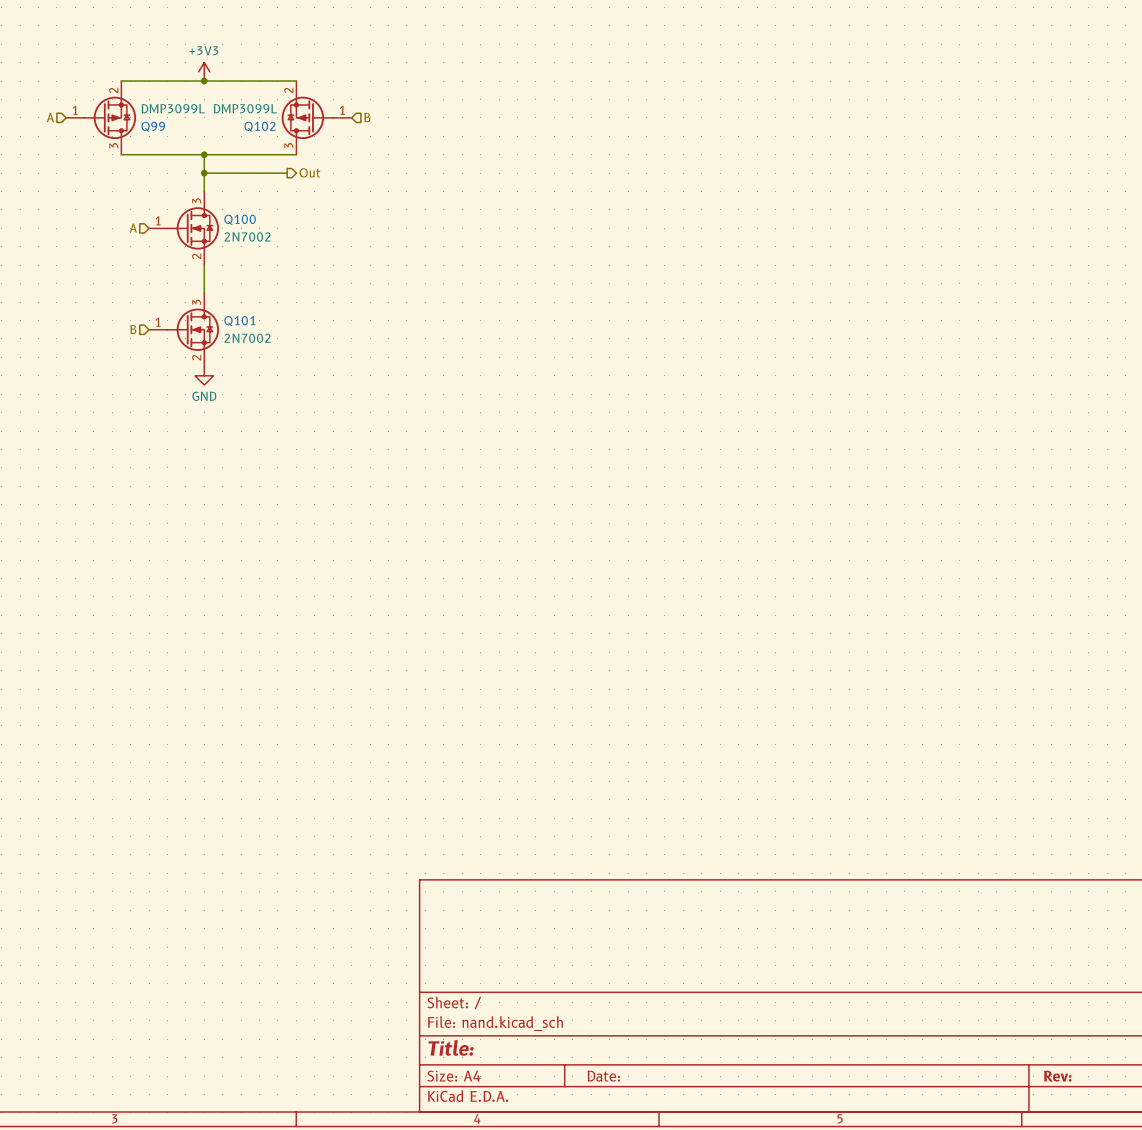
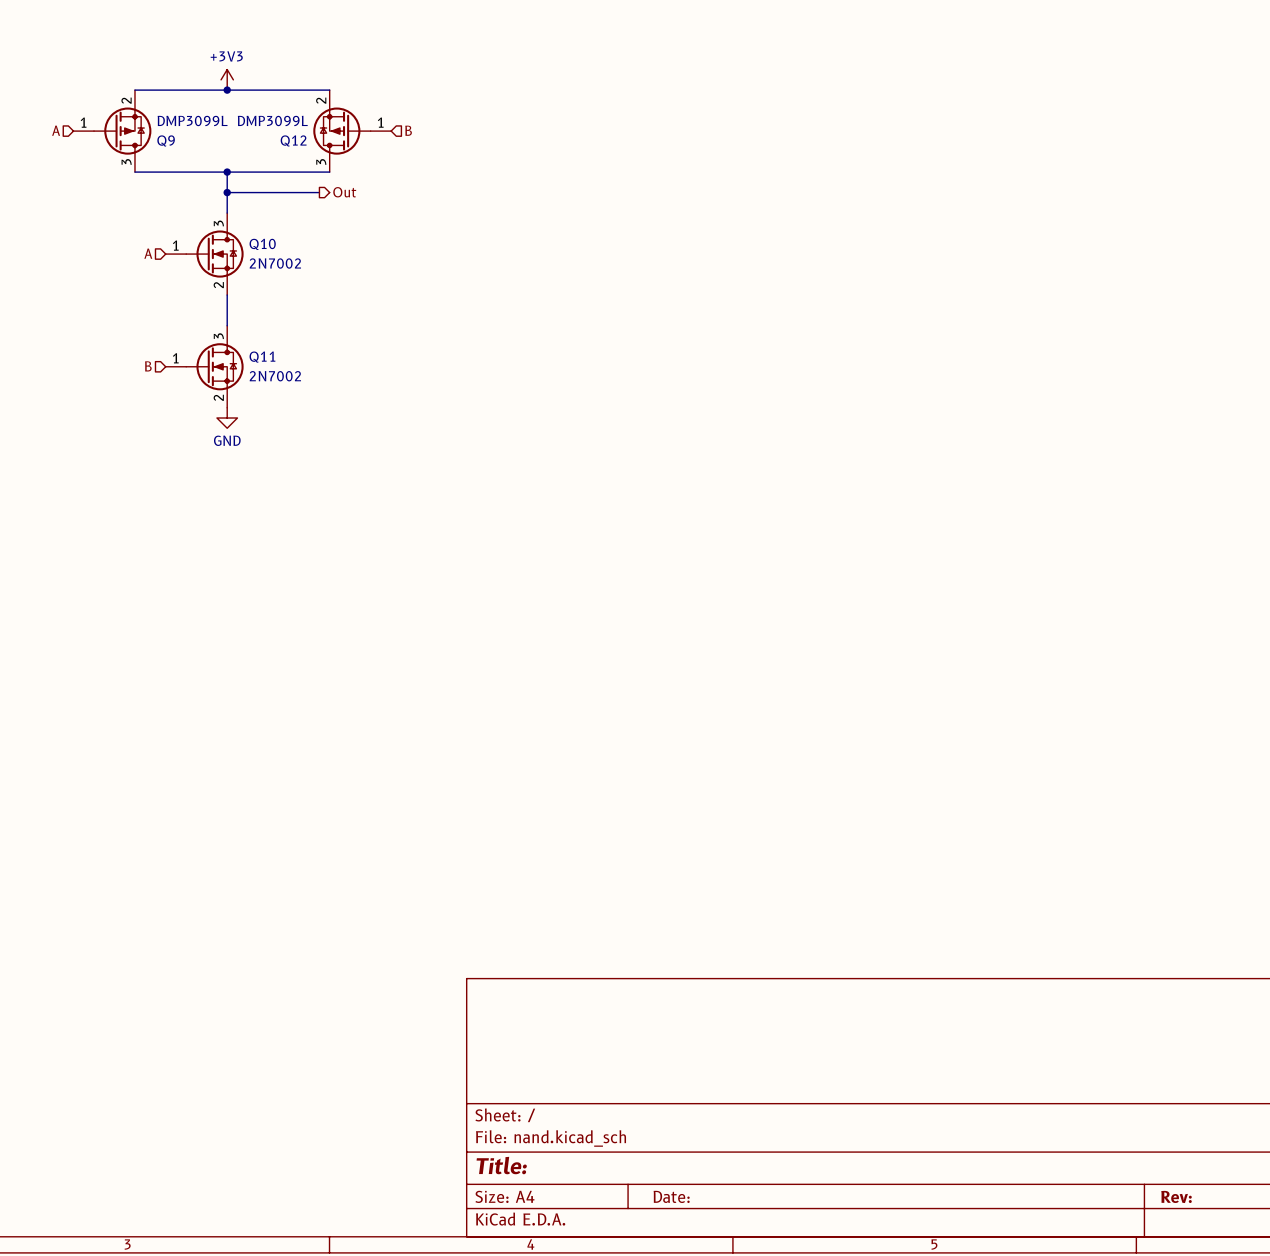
Q99 name: Q99 (153, 126) -> Q9 (166, 140)
Q102 name: Q102 (260, 126) -> Q12 (293, 140)
Q100 name: Q100 (240, 219) -> Q10 (262, 244)
Q101 name: Q101 (239, 321) -> Q11 (262, 357)

